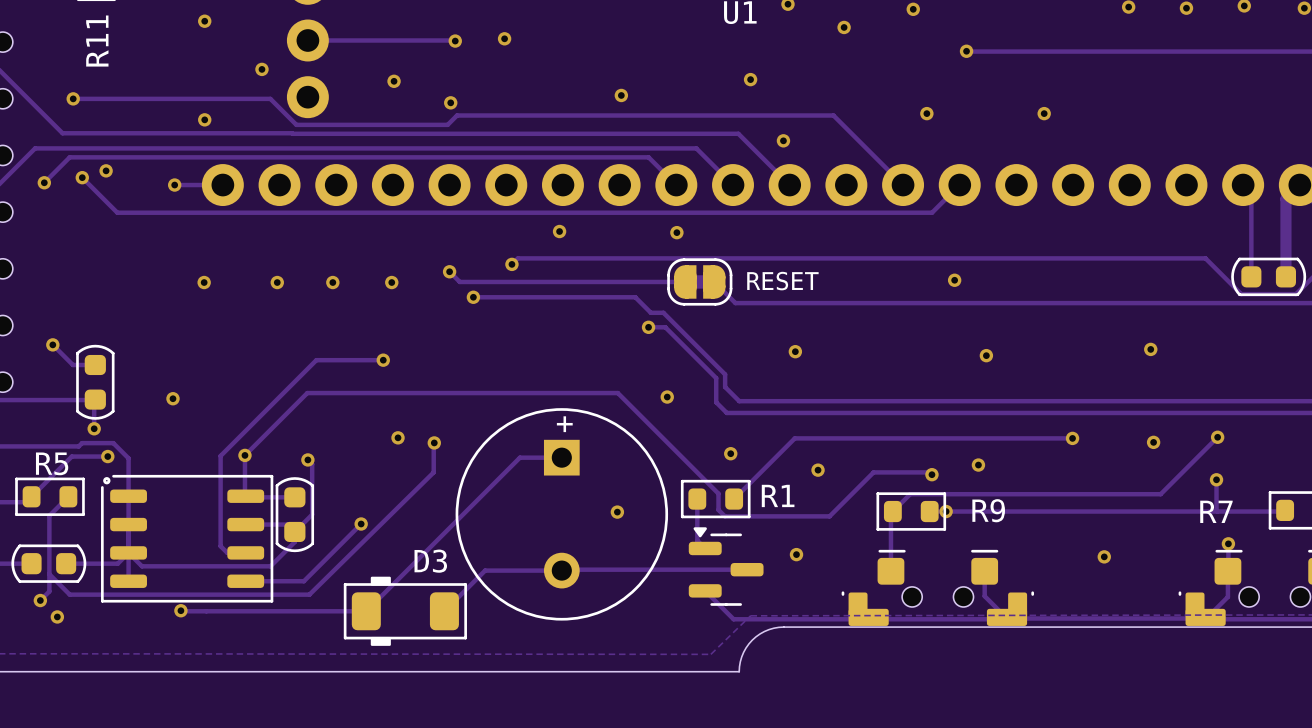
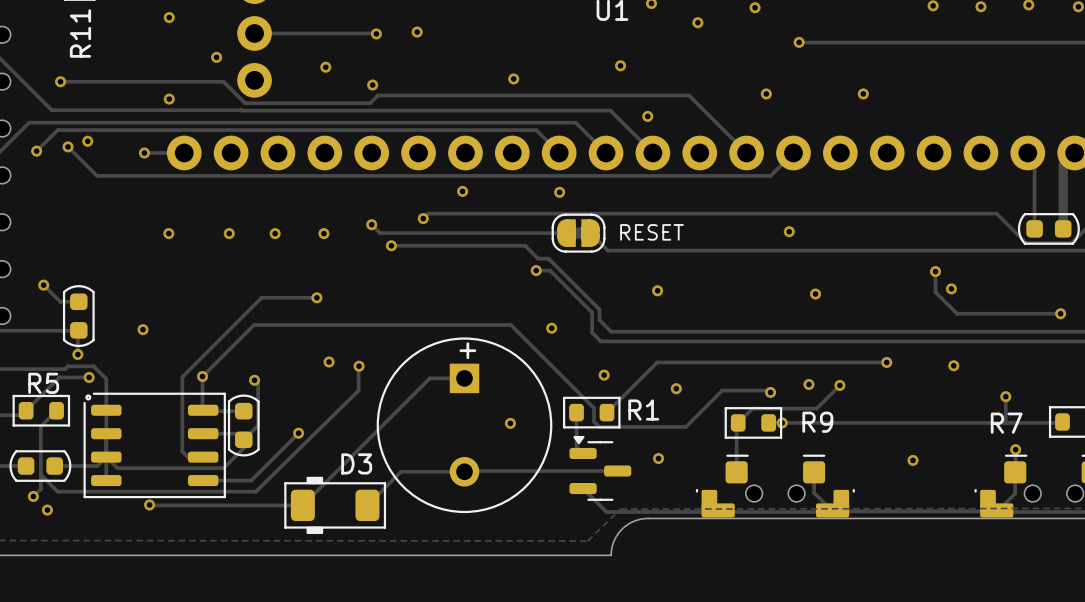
track: none -> (935, 271) (935, 292) (957, 313) (1060, 313)
via: none -> (935, 271)
via: none -> (1060, 313)
track: (1217, 437) (1160, 494) (987, 494) -> (839, 385) (816, 408)
via: (1217, 437) -> none
via: none -> (839, 385)

